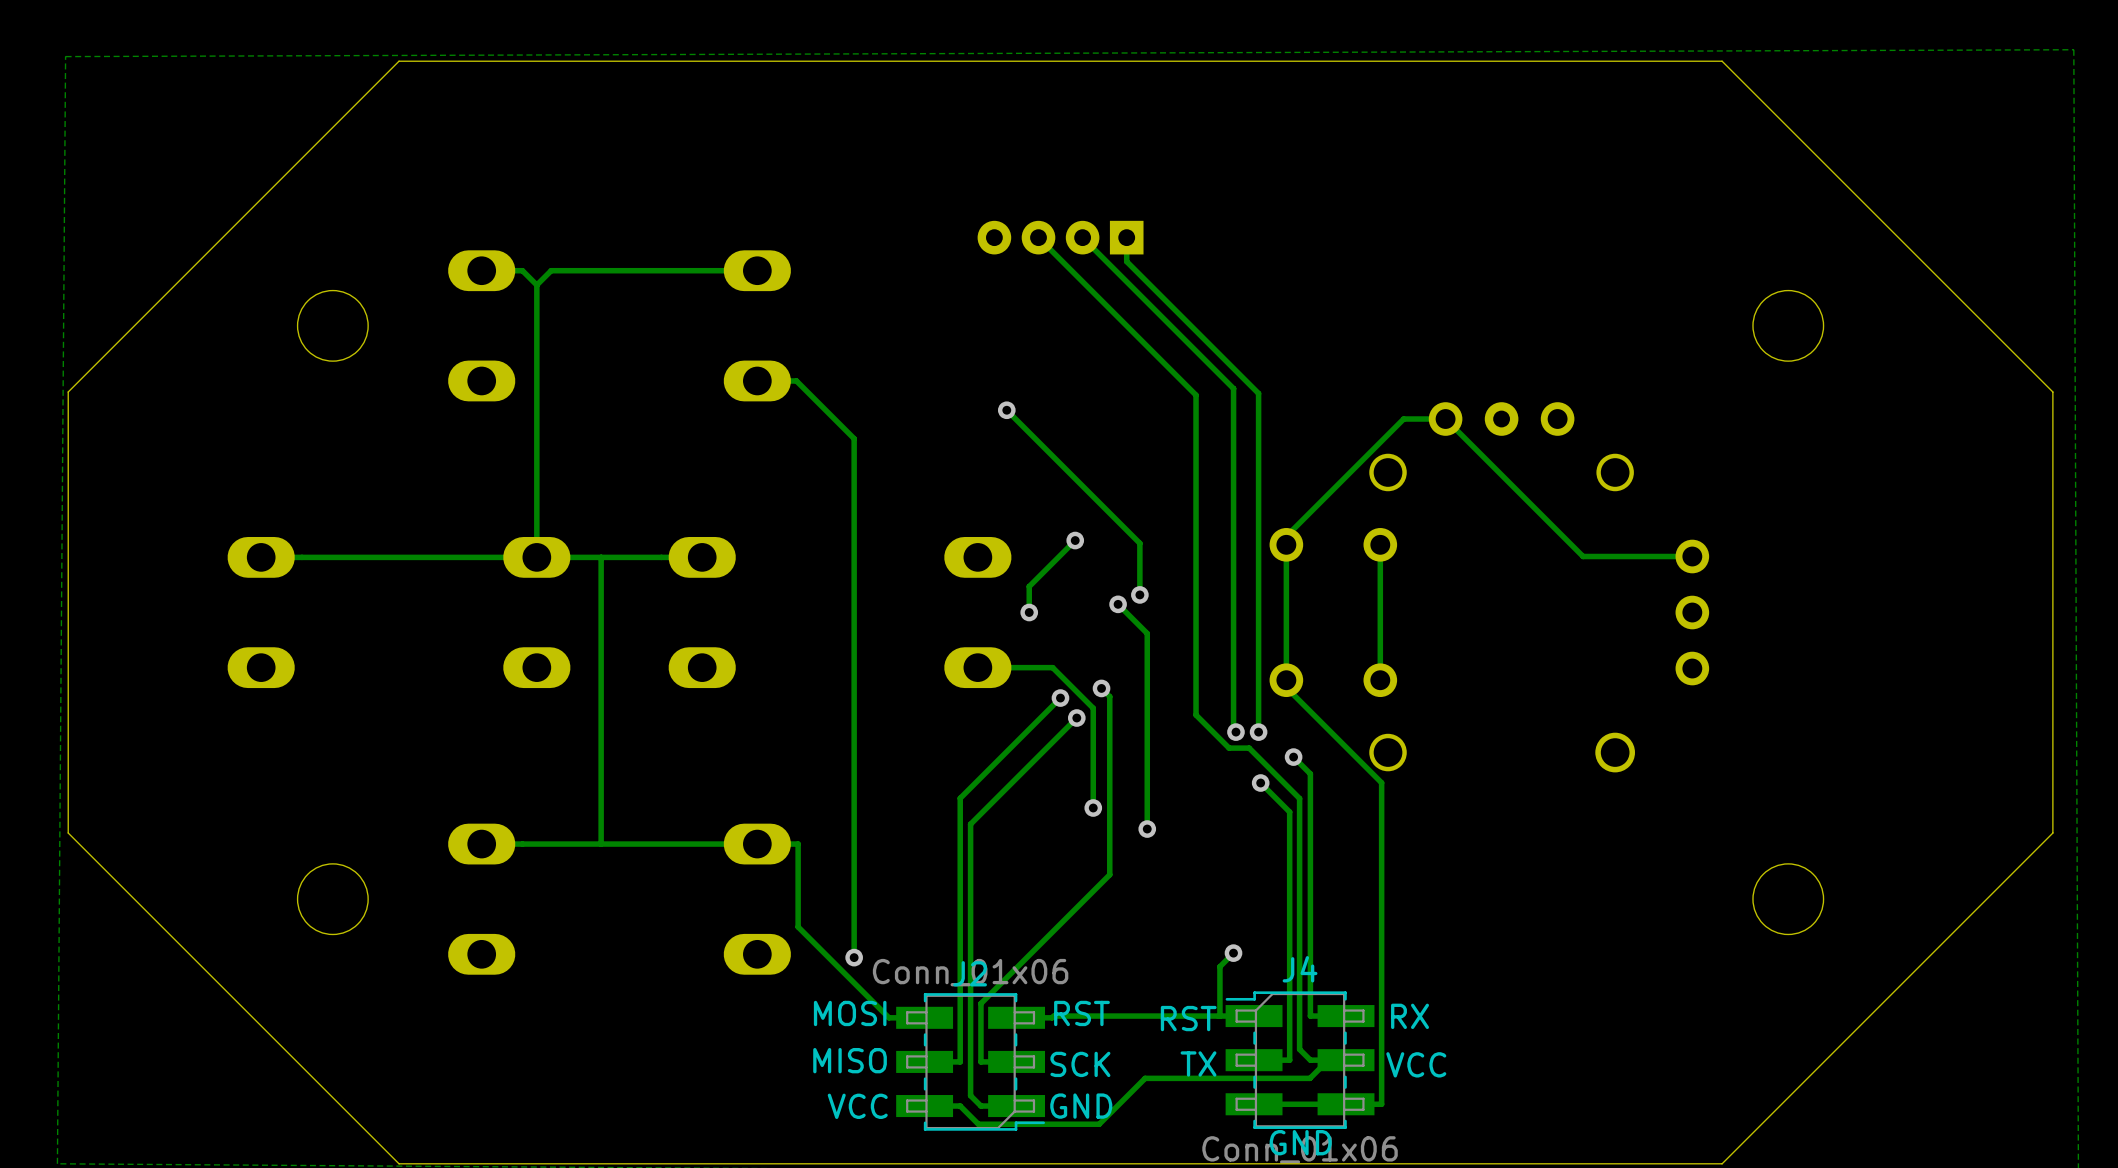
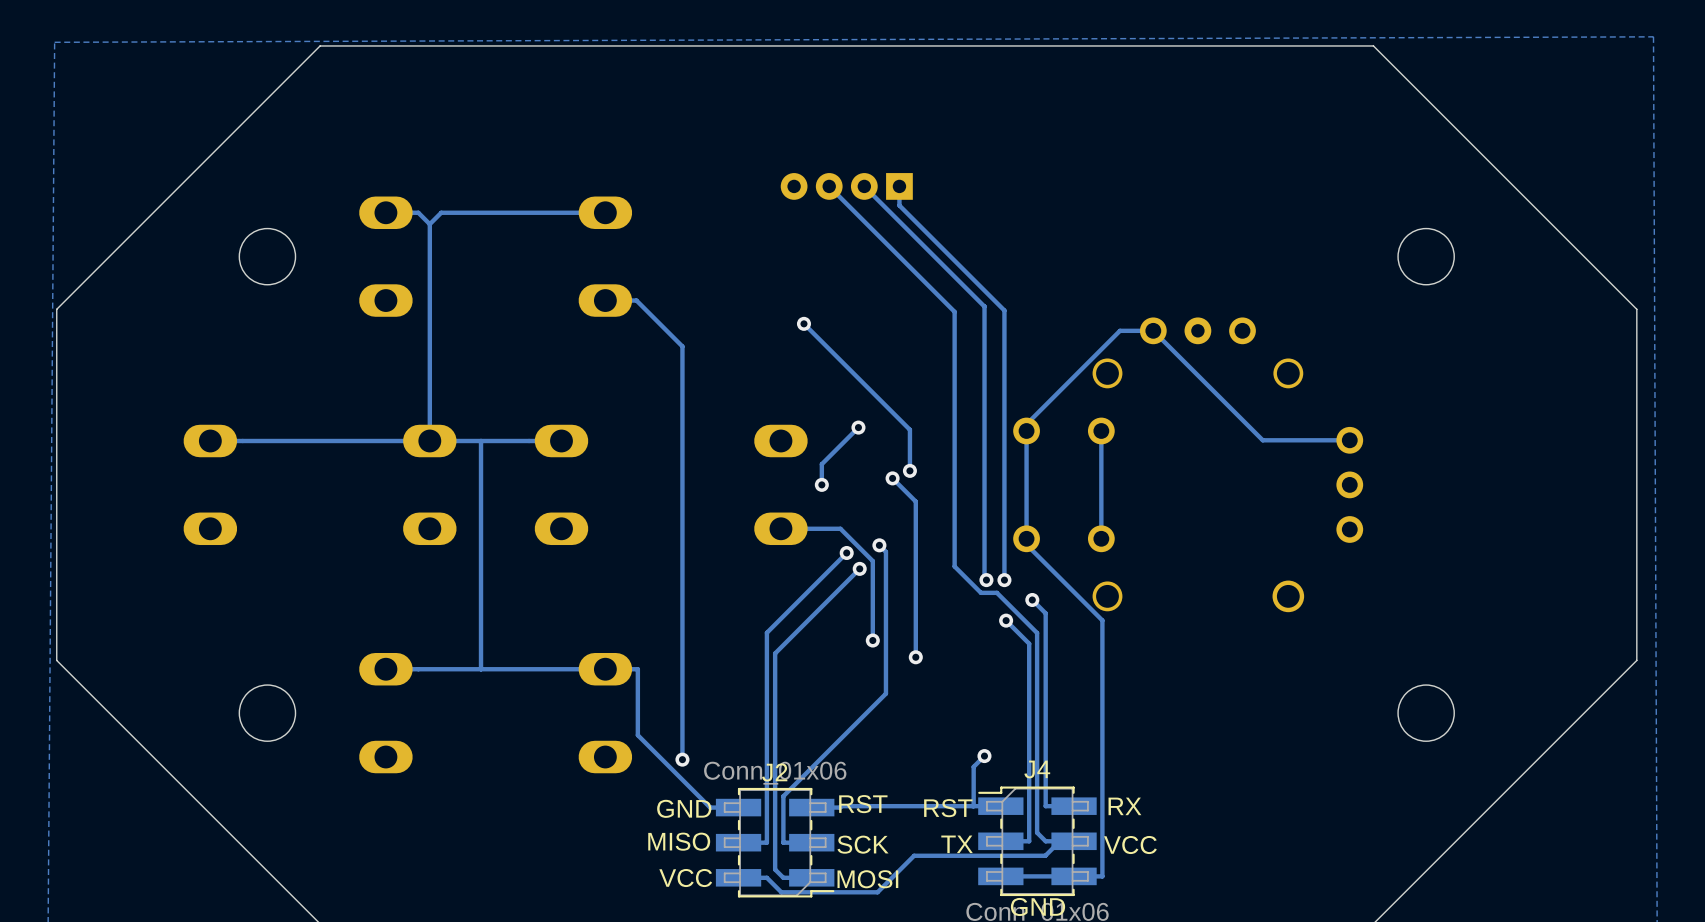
text position: MOSI (850, 1013) -> MOSI (867, 879)
text position: GND (1081, 1106) -> GND (684, 808)

